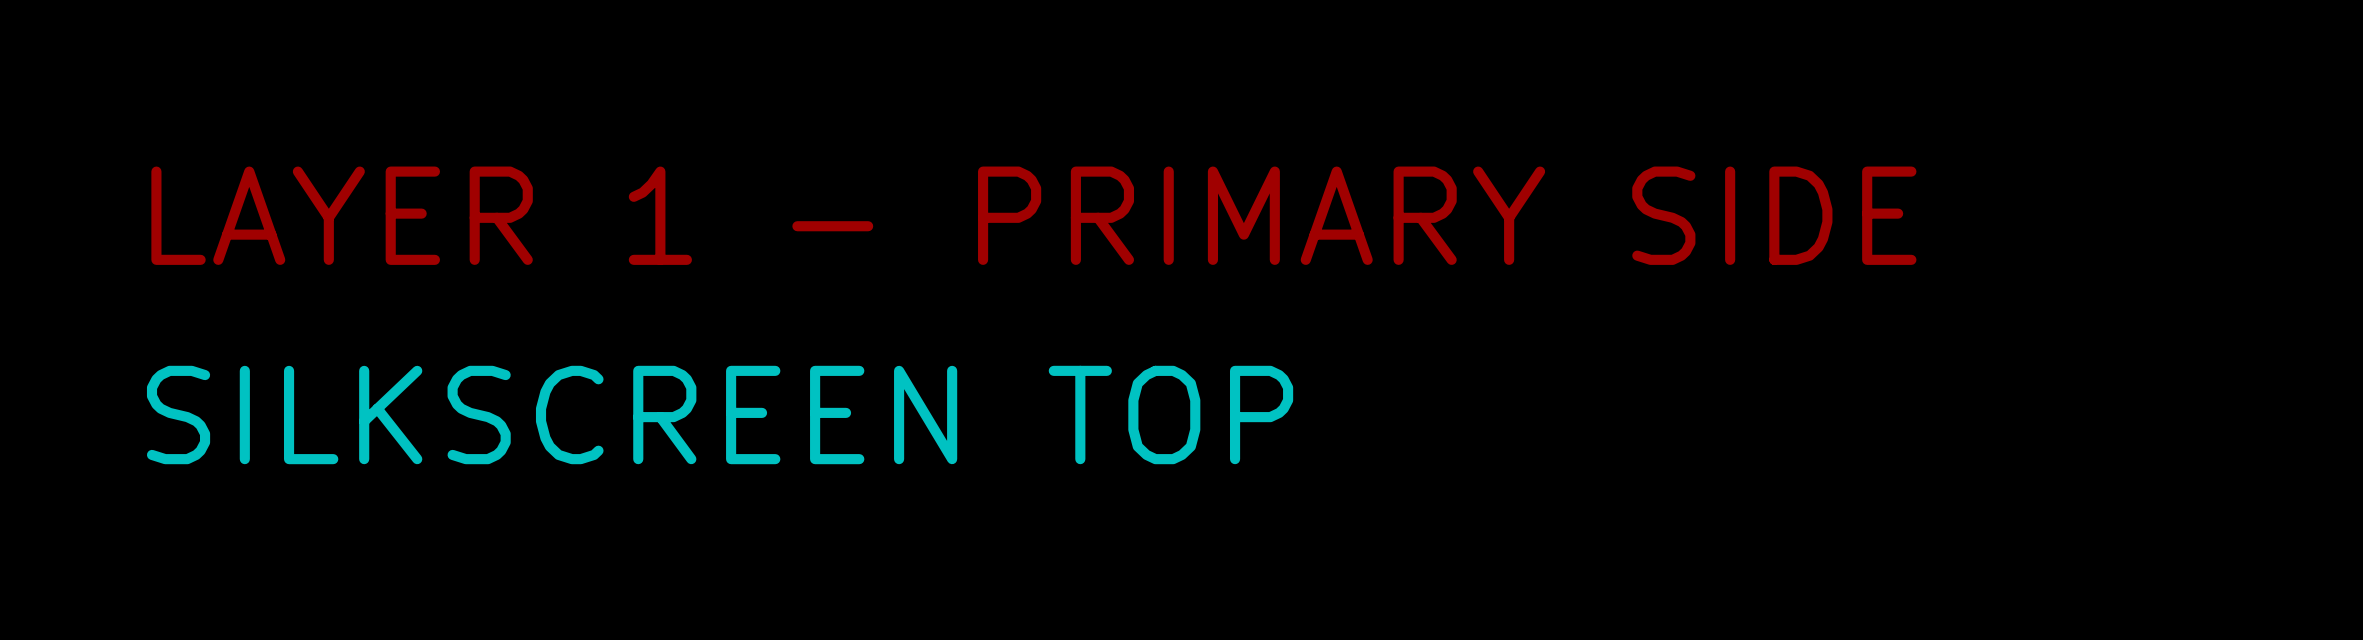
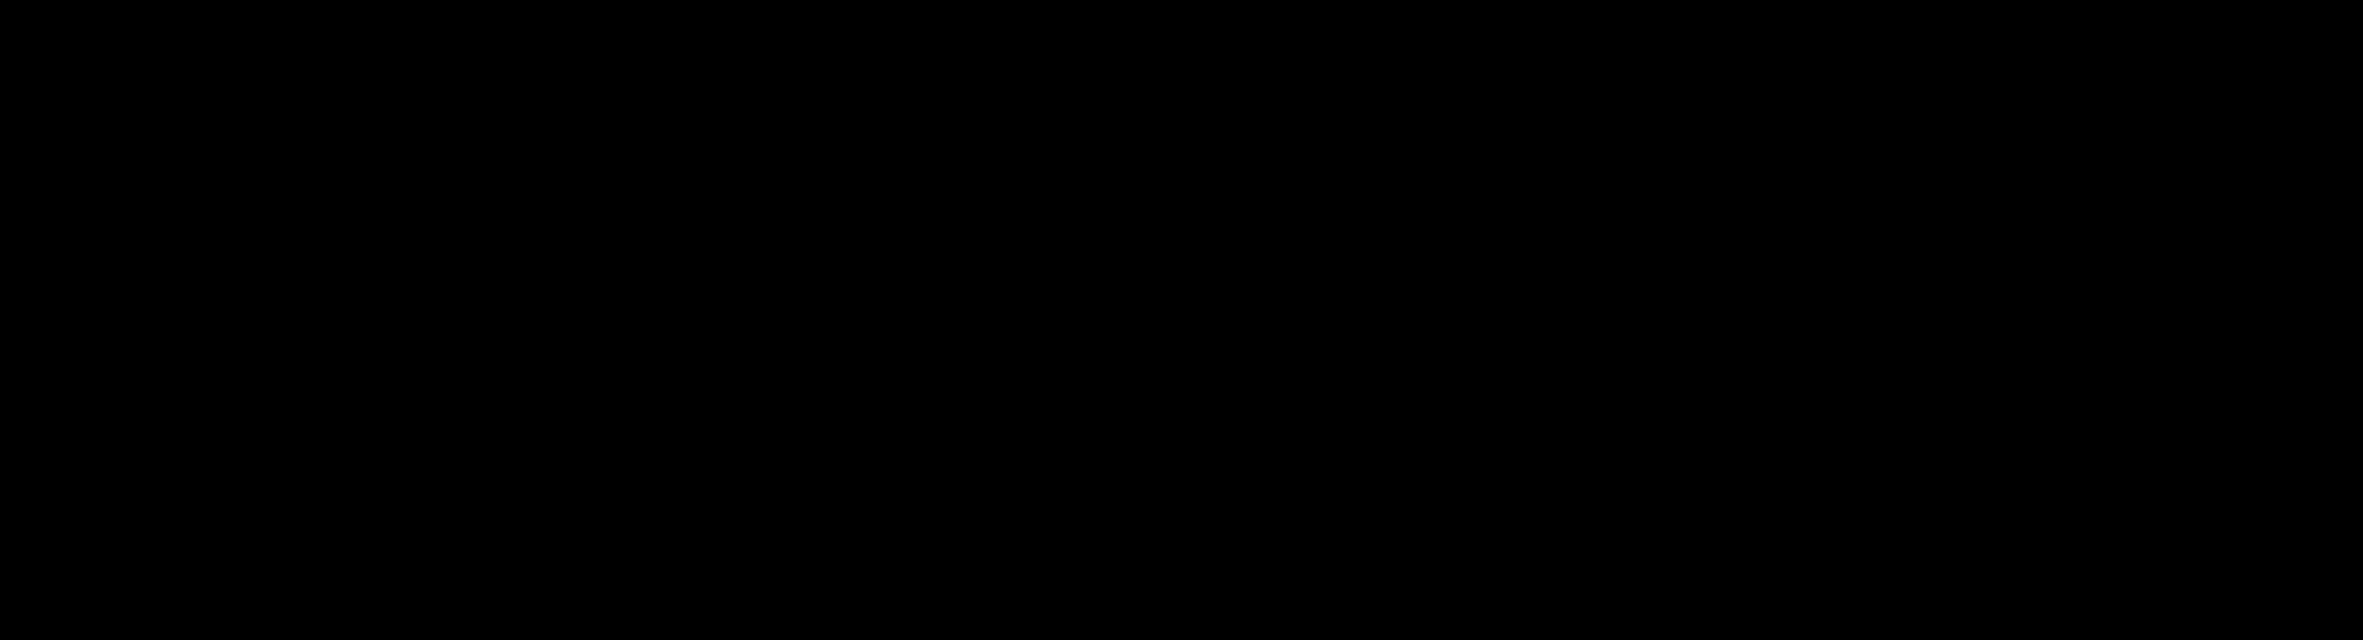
text: LAYER 1 - PRIMARY SIDE (1033, 215) -> none
text: SILKSCREEN TOP (720, 415) -> none

